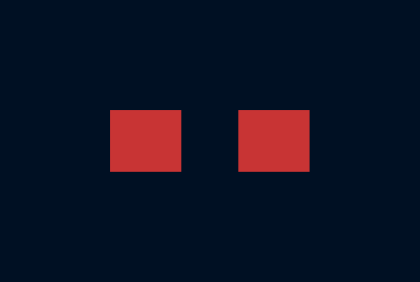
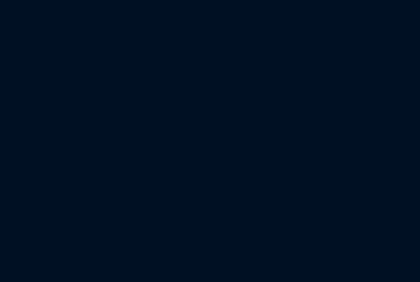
part: (209, 140) -> none

